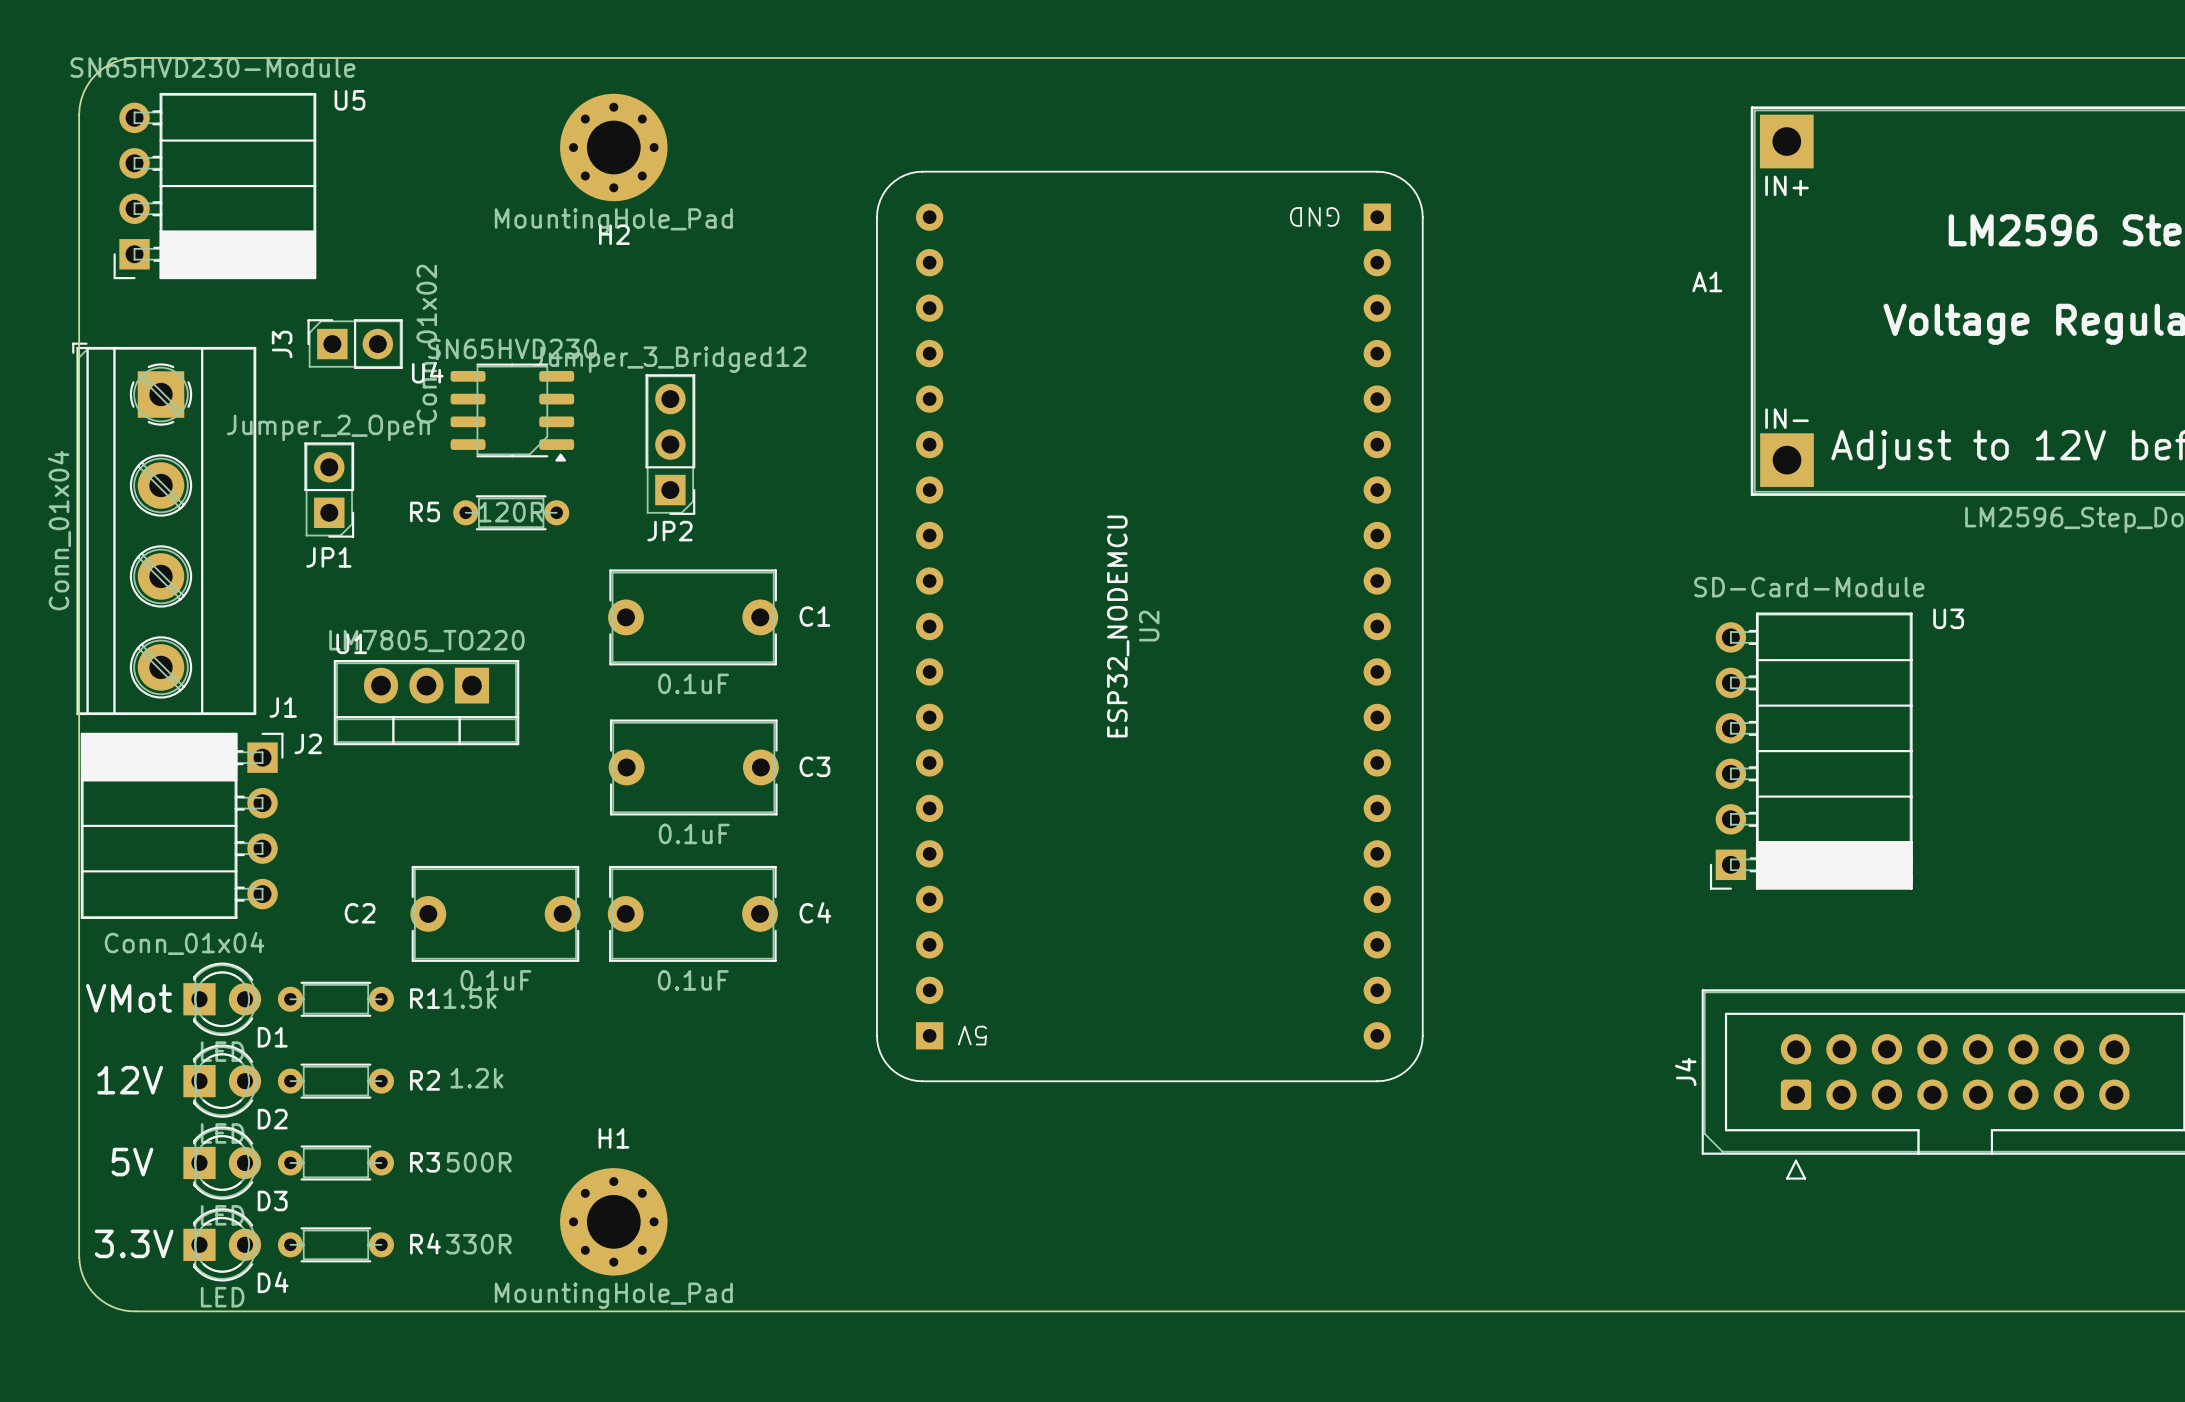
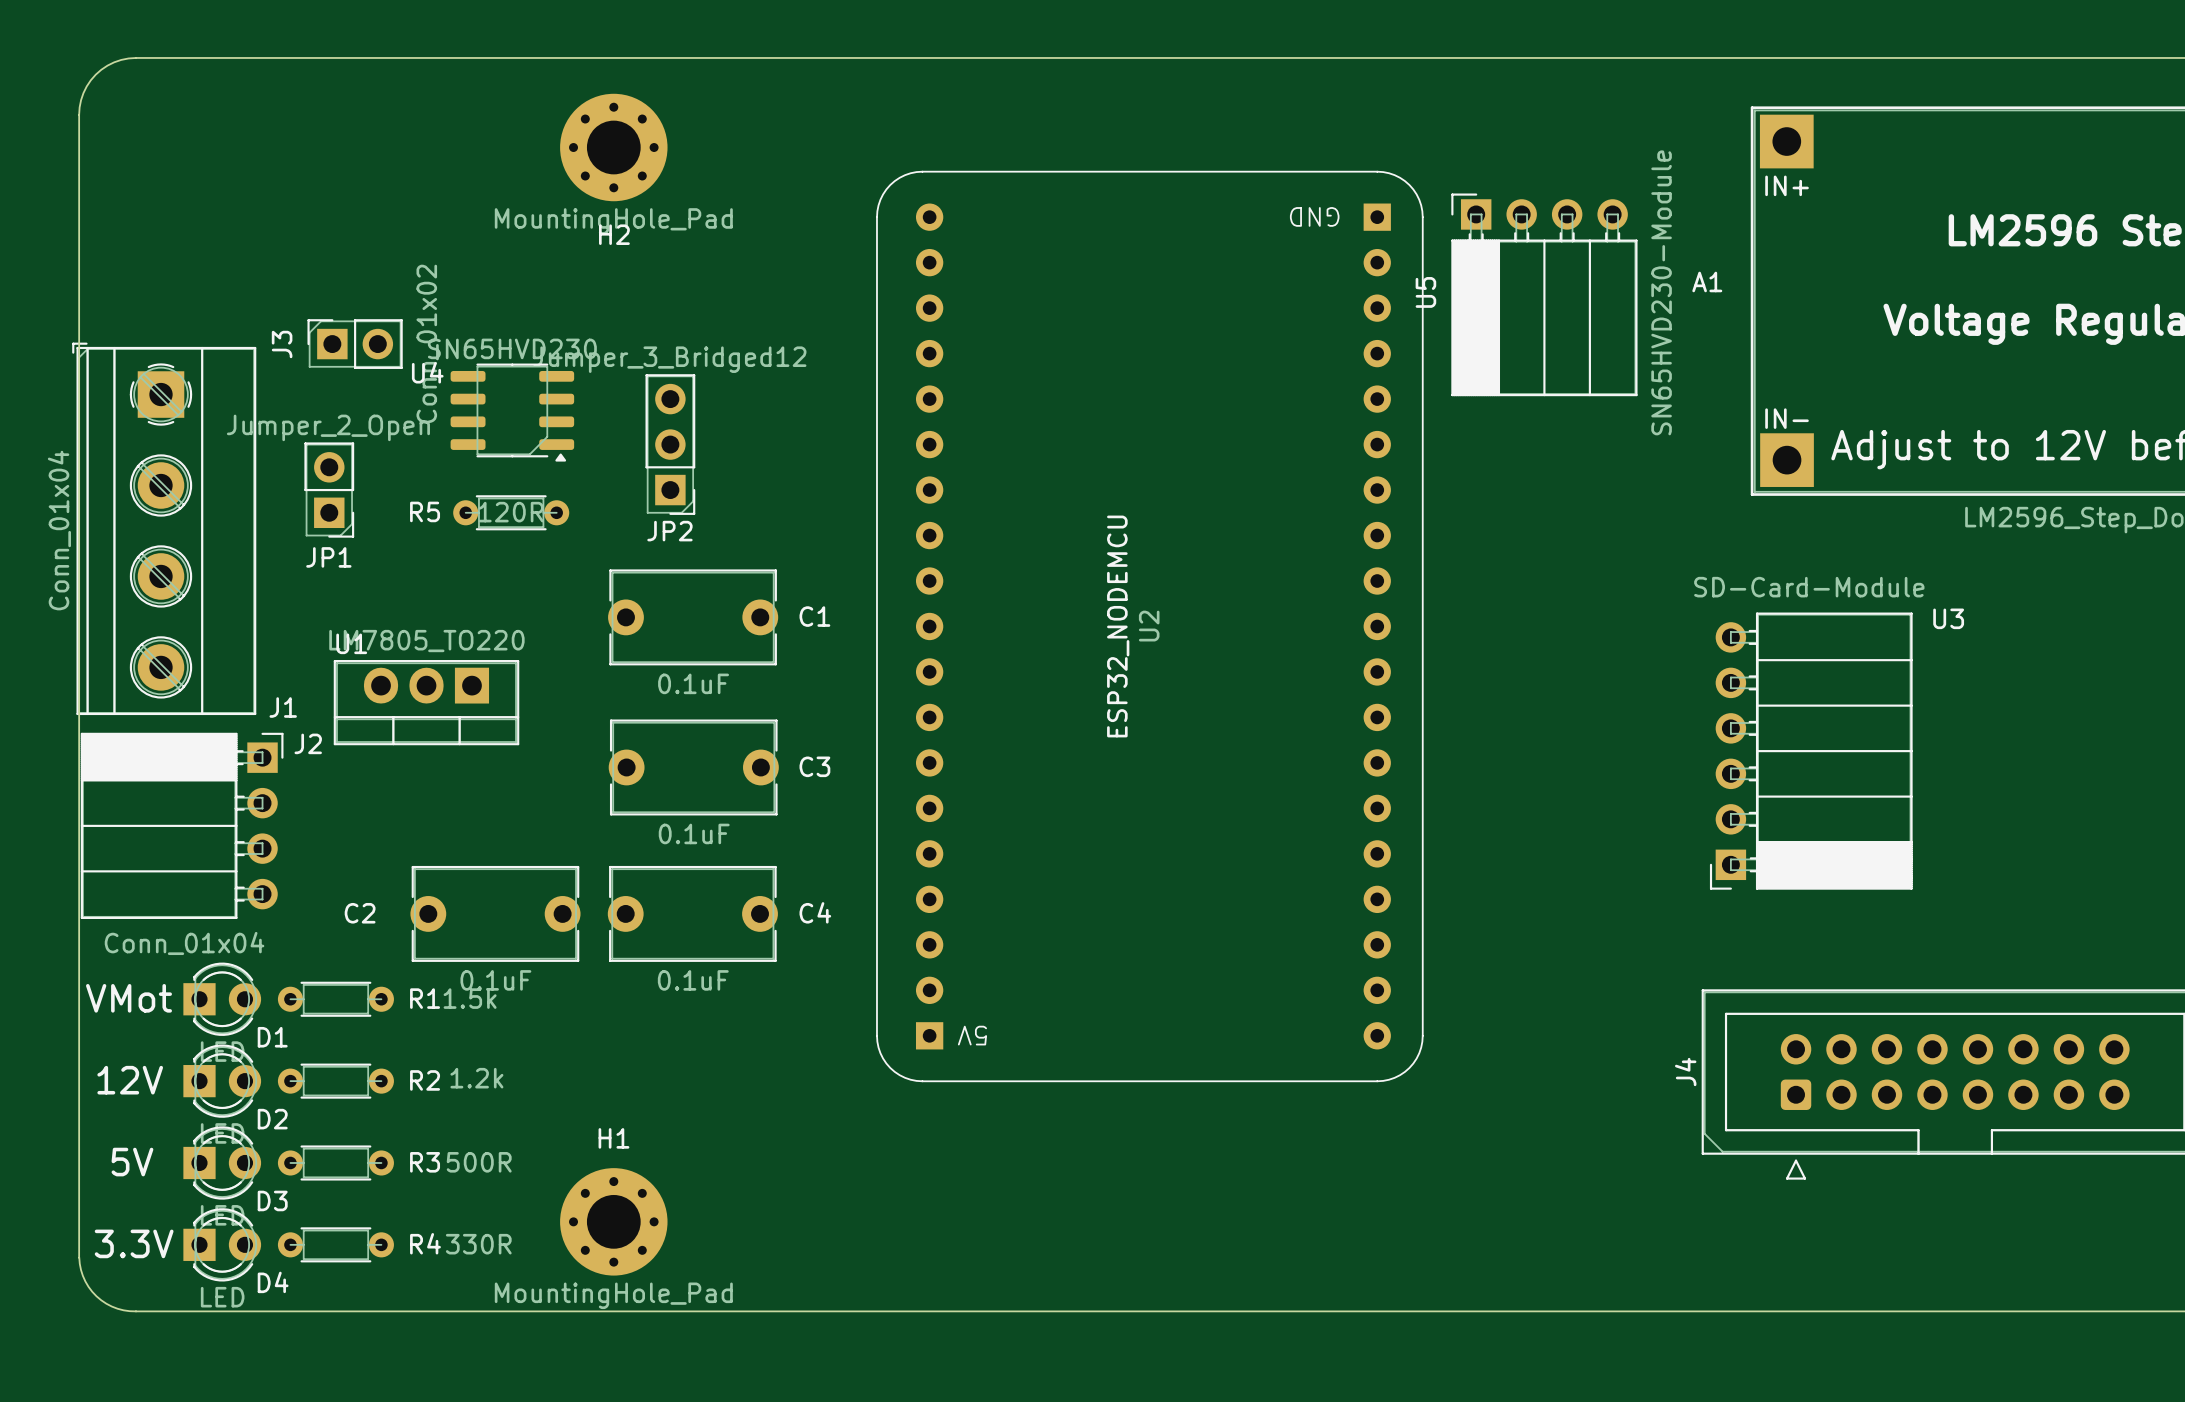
U5 name position: U5 (350, 100) -> U5 (1425, 292)
U5 rotation: 0° (214, 186) -> 90° clockwise (1544, 294)
U5 position: (214, 186) -> (1544, 294)

